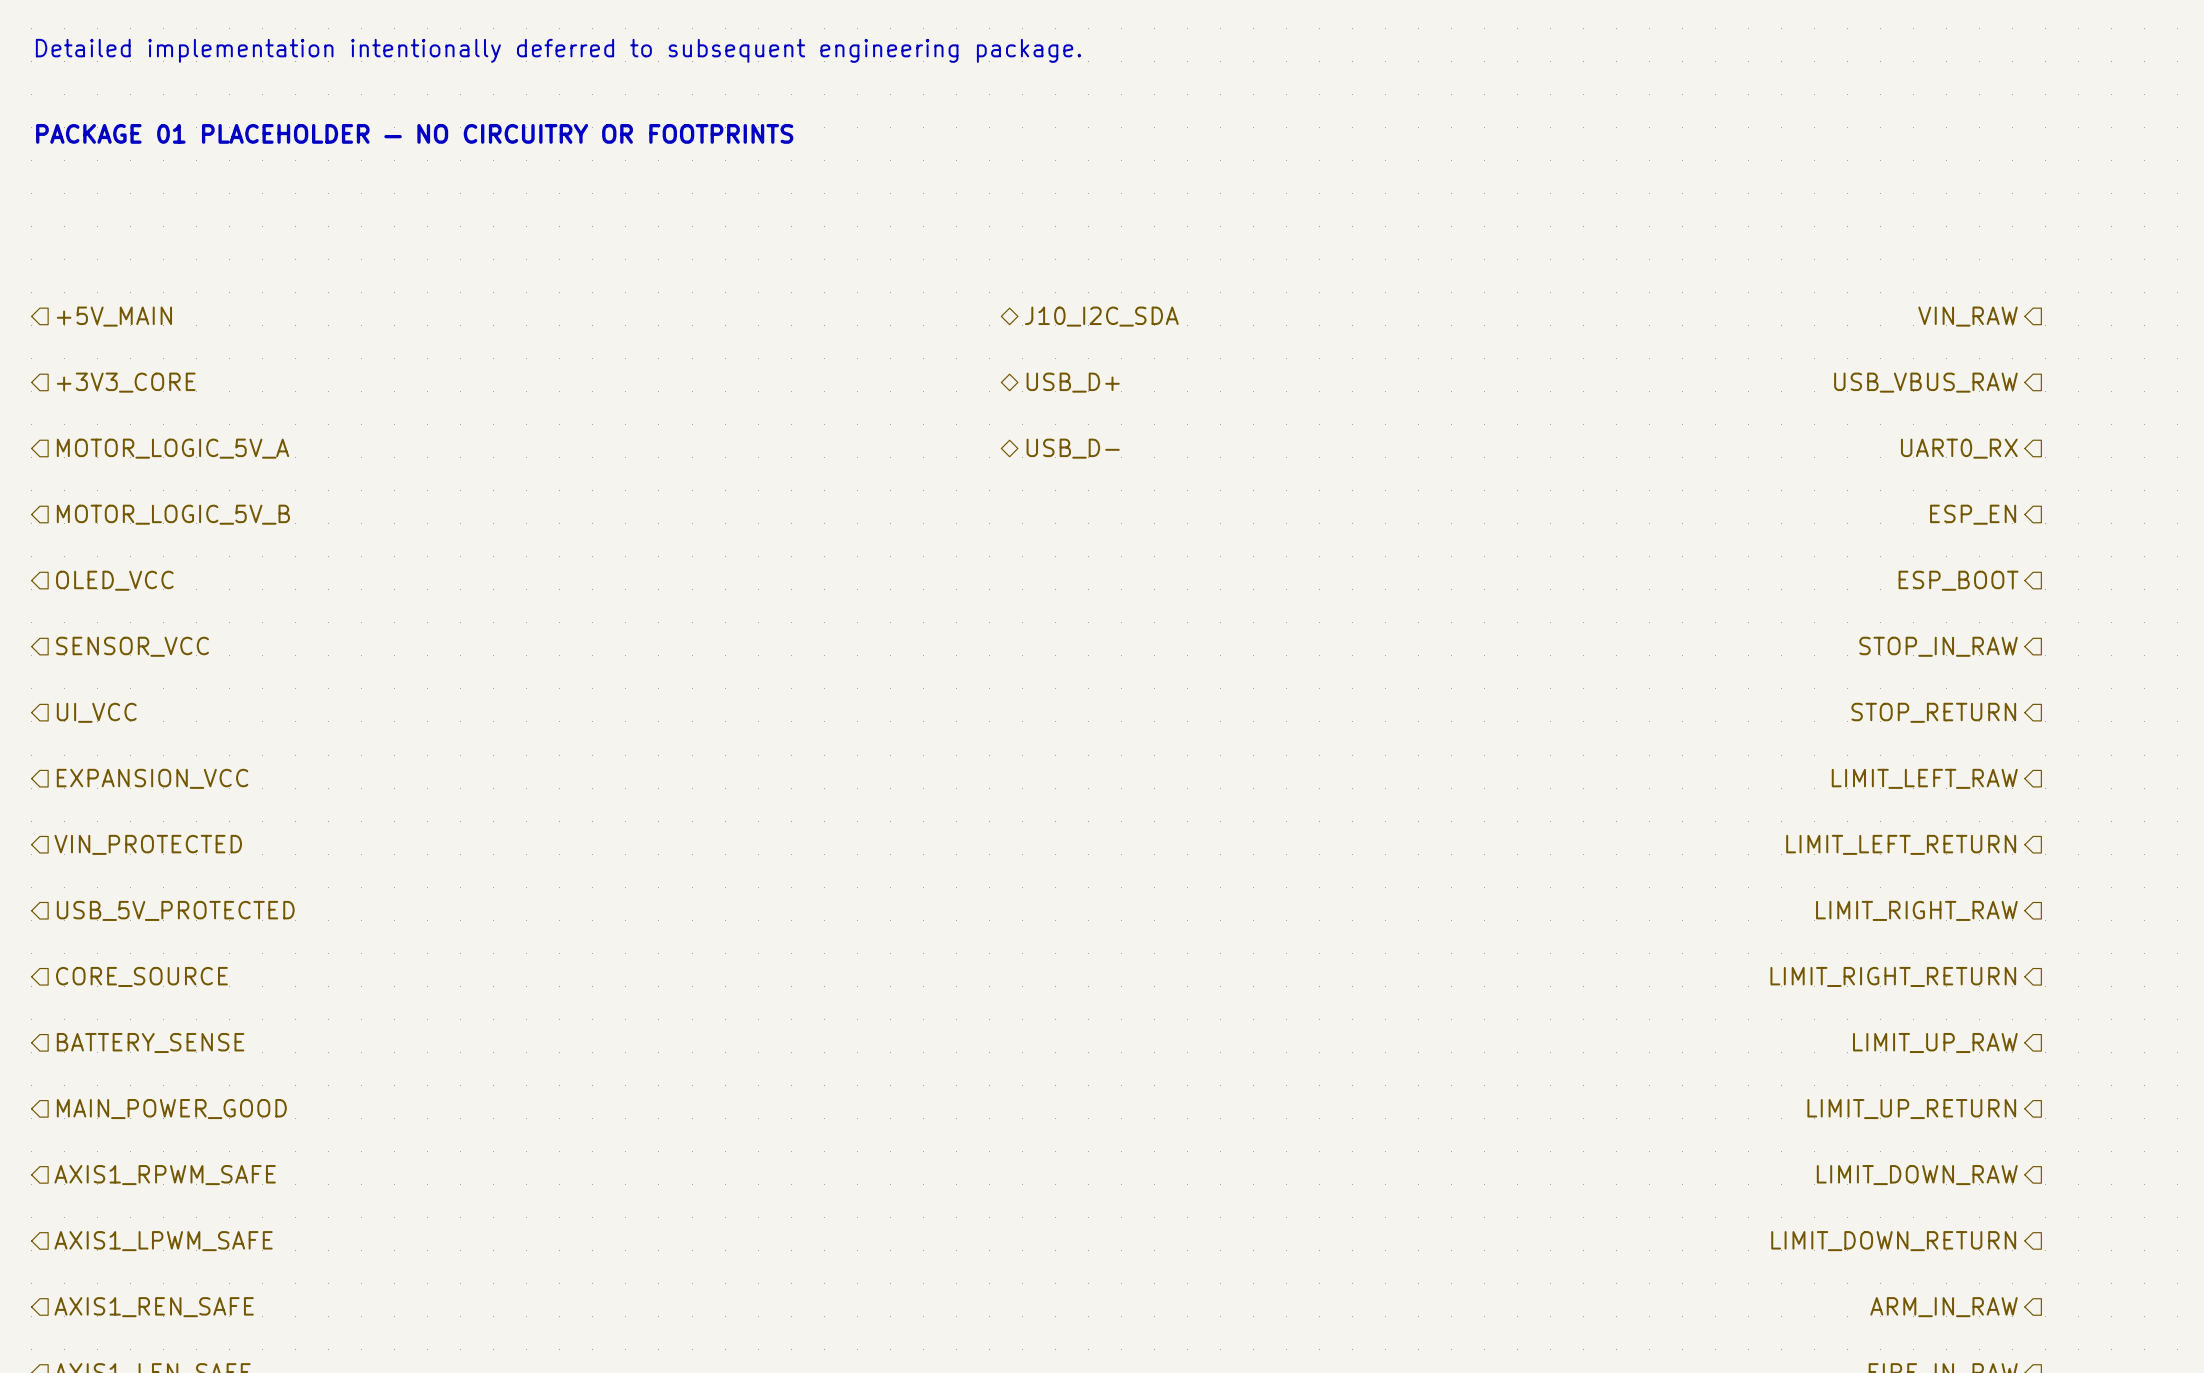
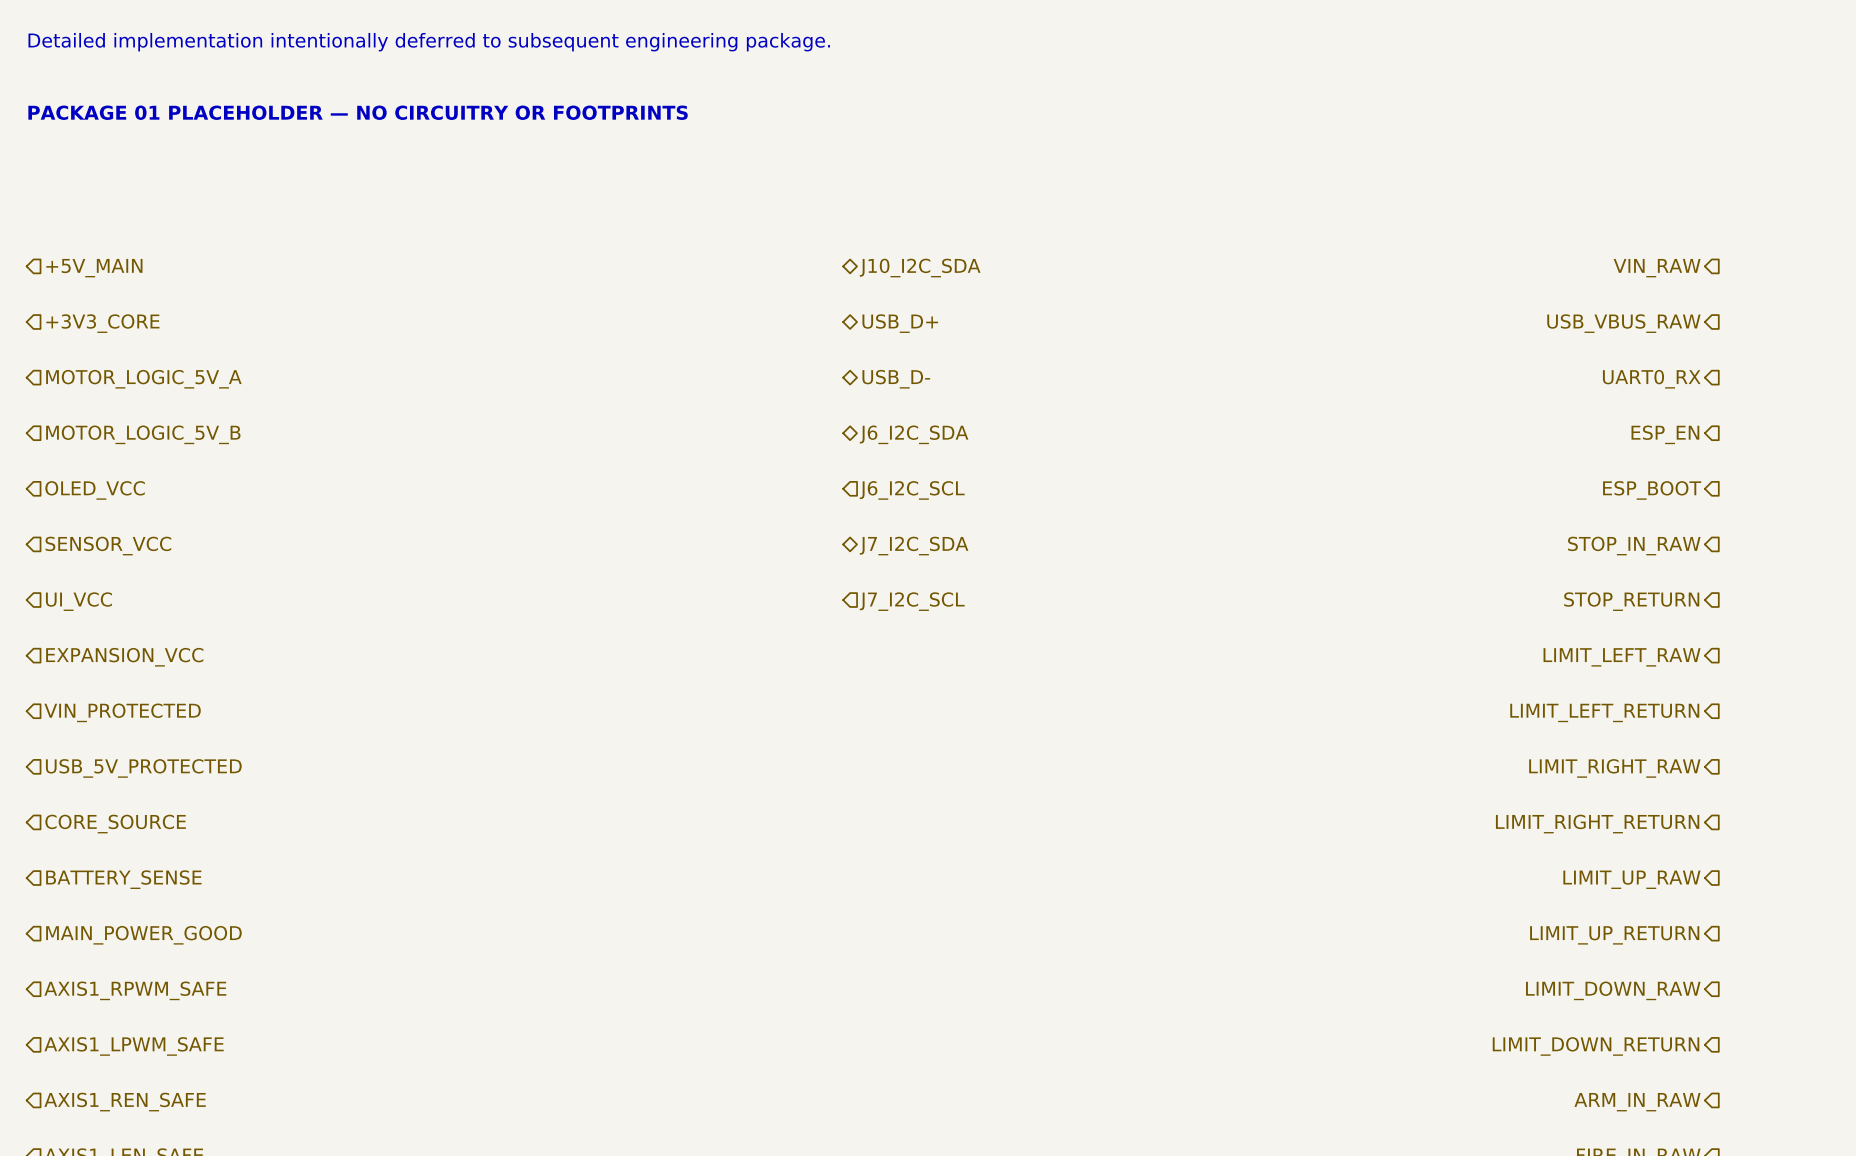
hierarchical label: none -> J6_I2C_SDA (914, 434)
hierarchical label: none -> J6_I2C_SCL (912, 490)
hierarchical label: none -> J7_I2C_SDA (914, 546)
hierarchical label: none -> J7_I2C_SCL (912, 601)

